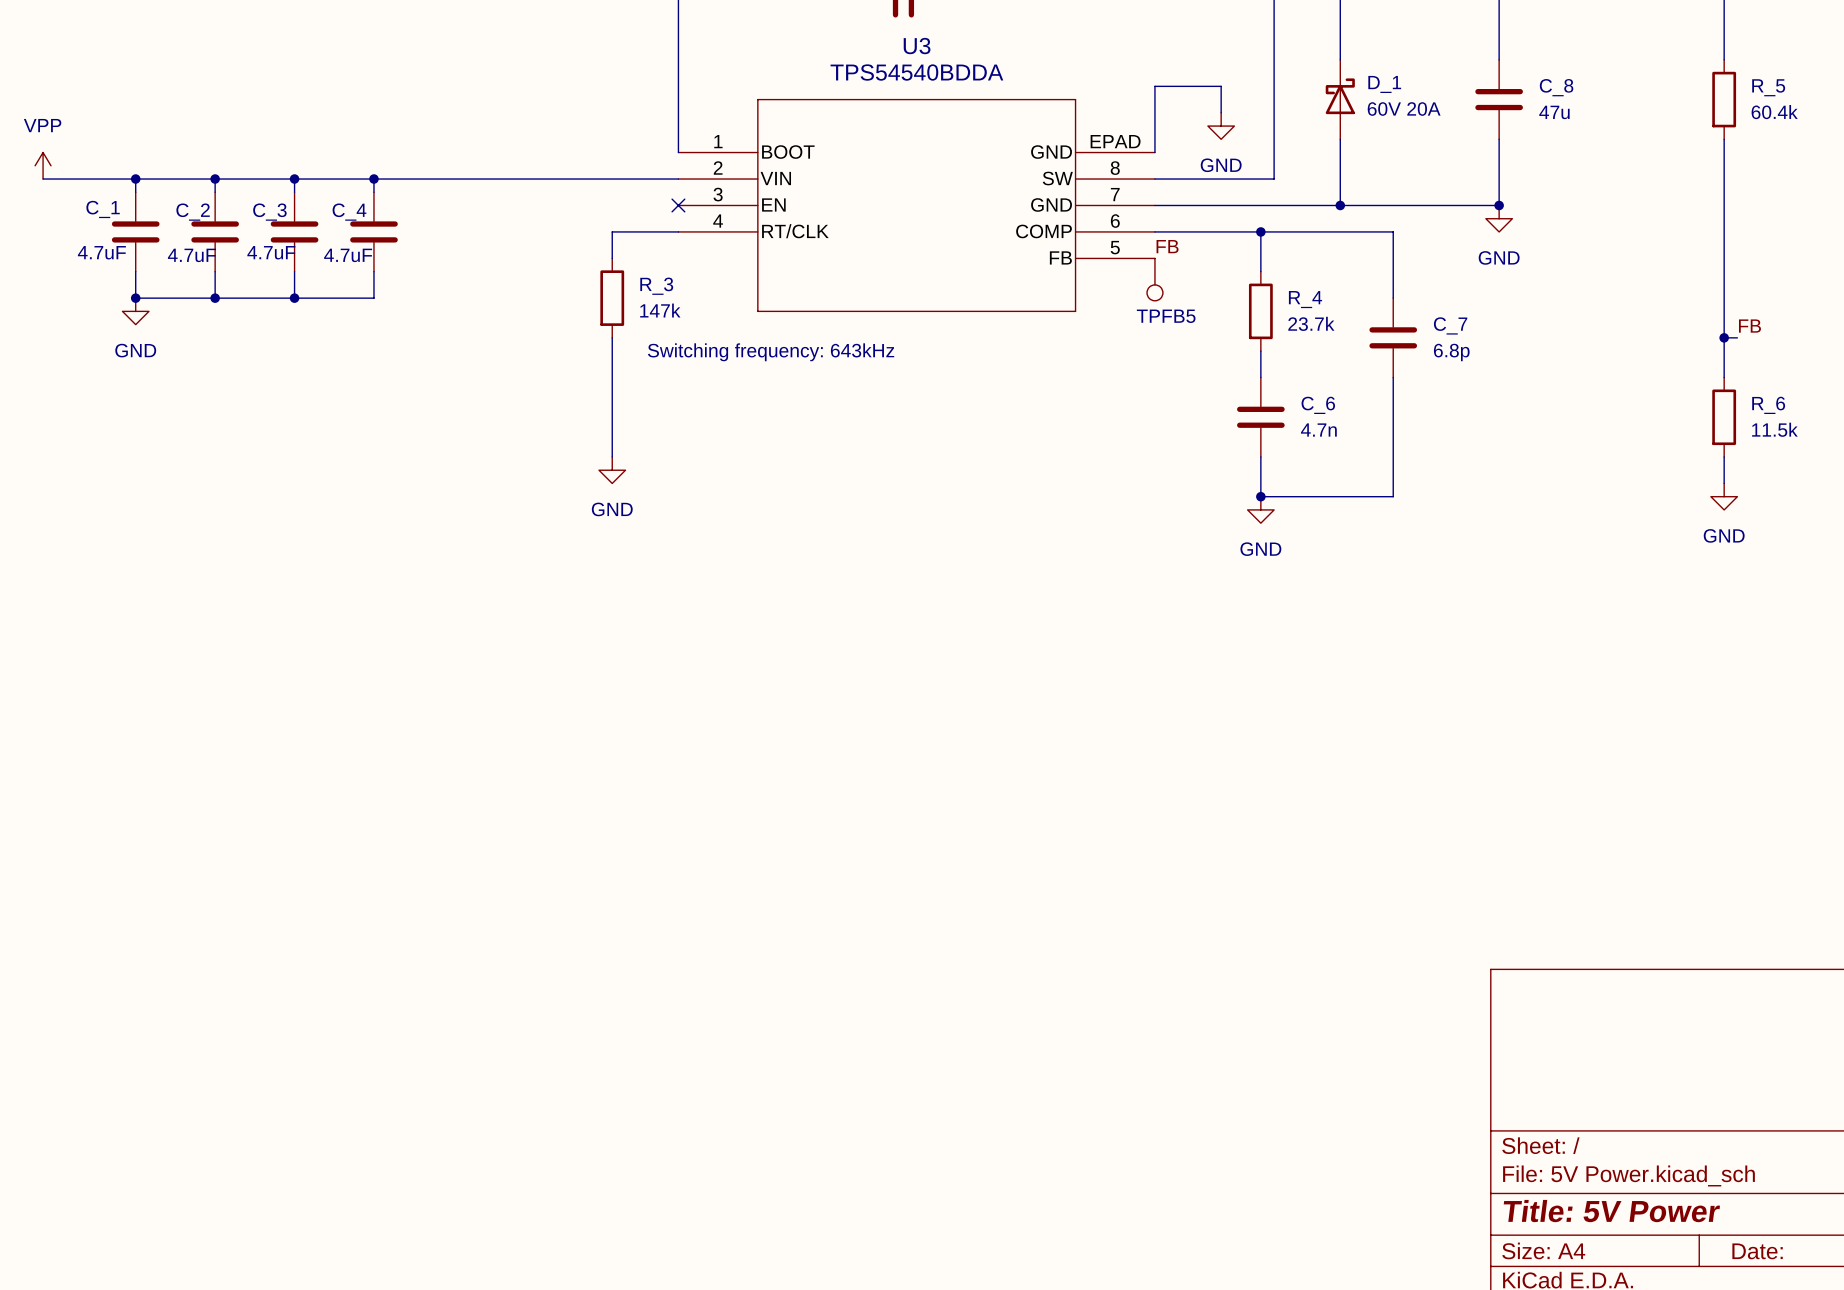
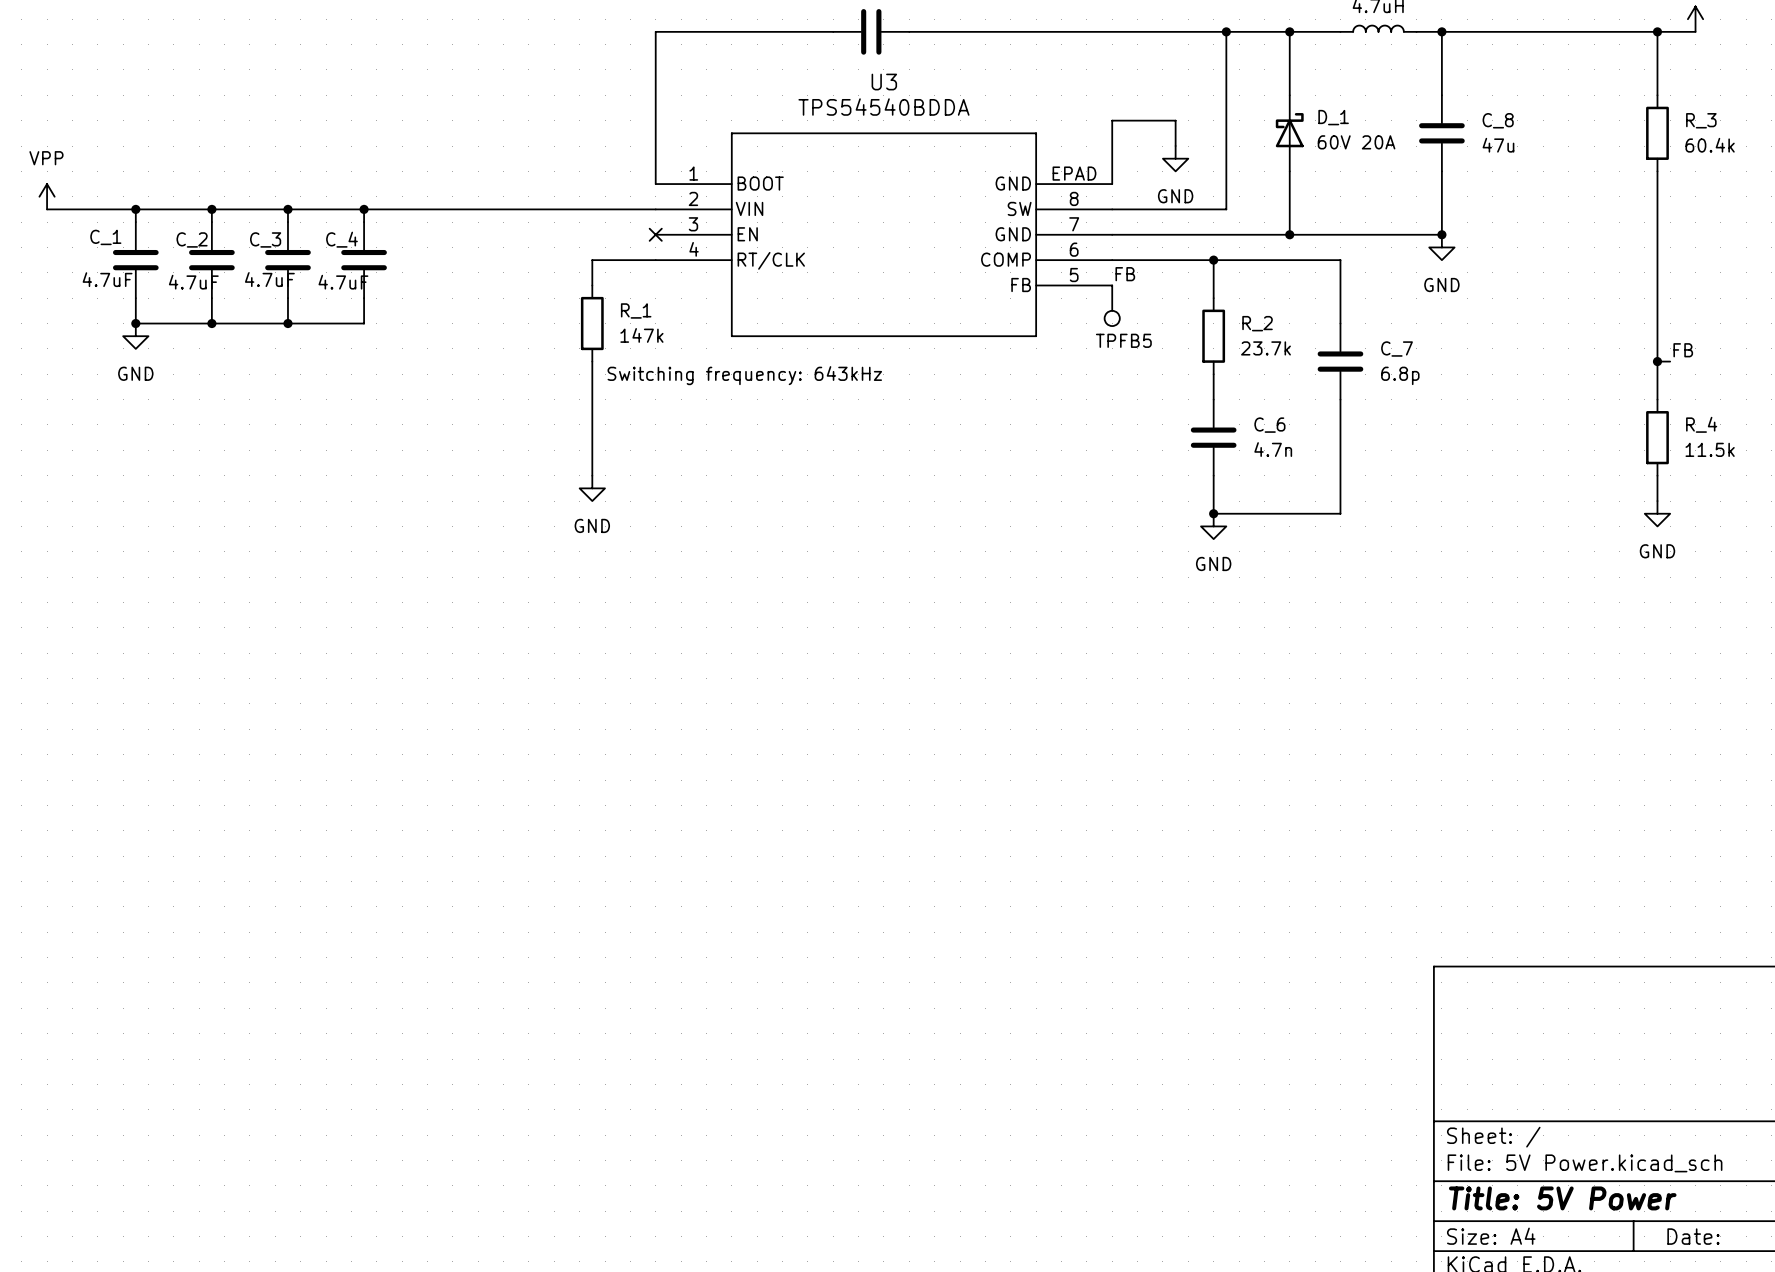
R_5 name: R_5 (1768, 87) -> R_3 (1701, 120)
R_3 name: R_3 (656, 286) -> R_1 (636, 310)
R_4 name: R_4 (1305, 299) -> R_2 (1257, 323)
R_6 name: R_6 (1768, 405) -> R_4 (1701, 424)

